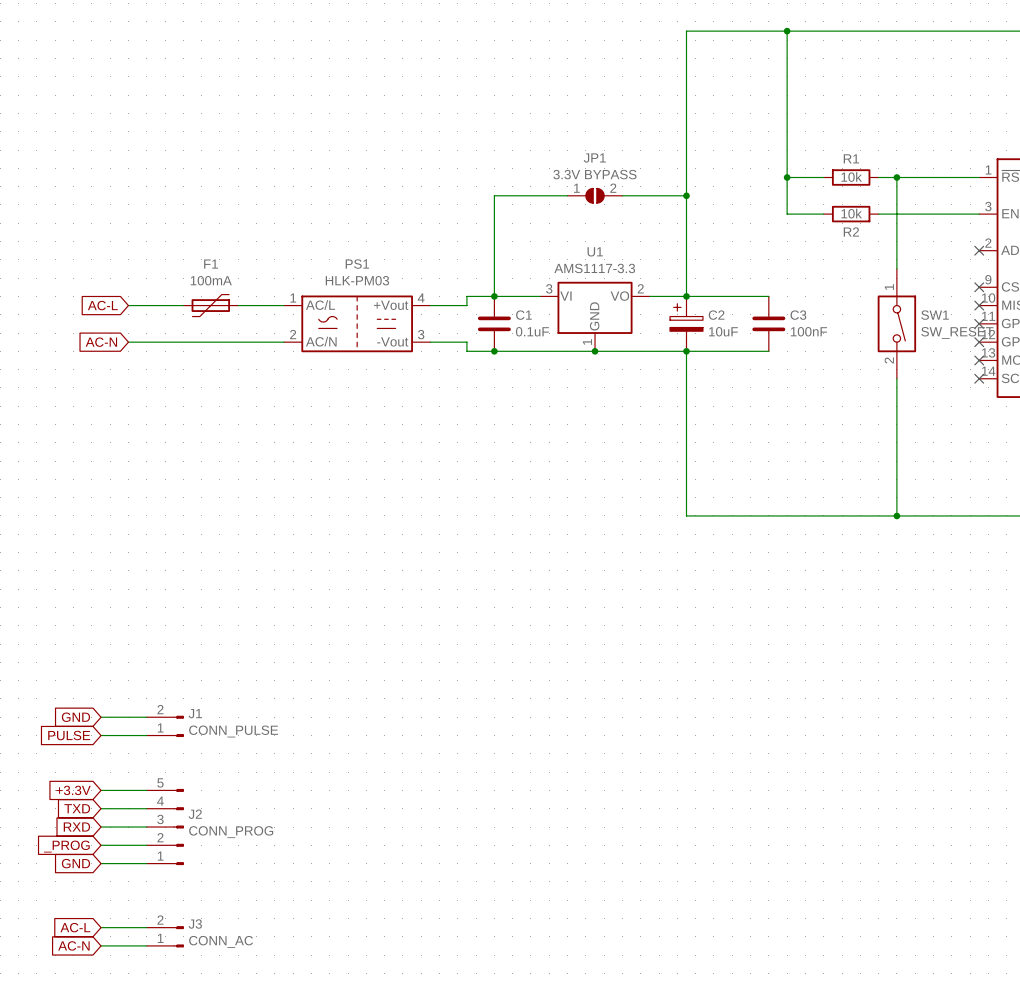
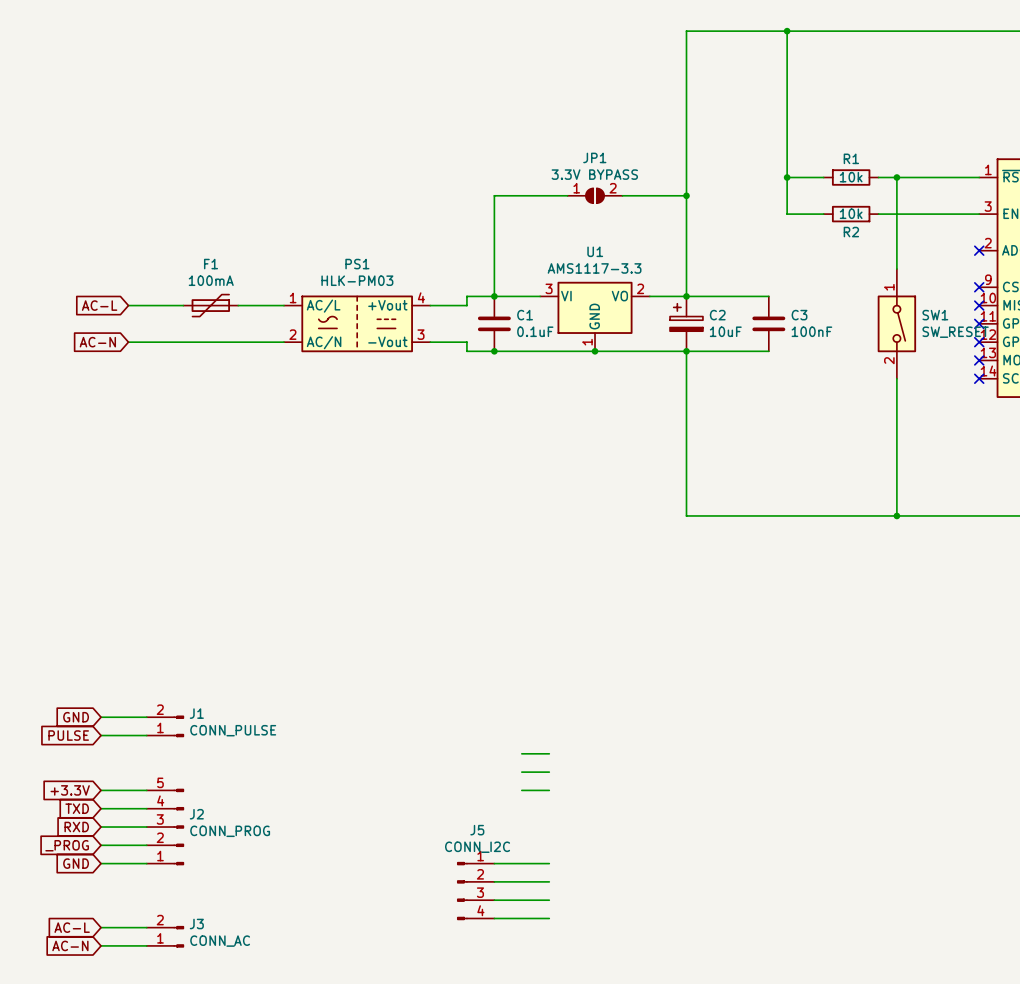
wire: none -> (521, 753) (549, 753)
wire: none -> (521, 772) (549, 772)
wire: none -> (521, 790) (549, 790)
wire: none -> (494, 863) (549, 863)
wire: none -> (494, 881) (549, 881)
J5: none -> CONN_I2C (475, 891)
wire: none -> (494, 900) (549, 900)
wire: none -> (494, 918) (549, 918)

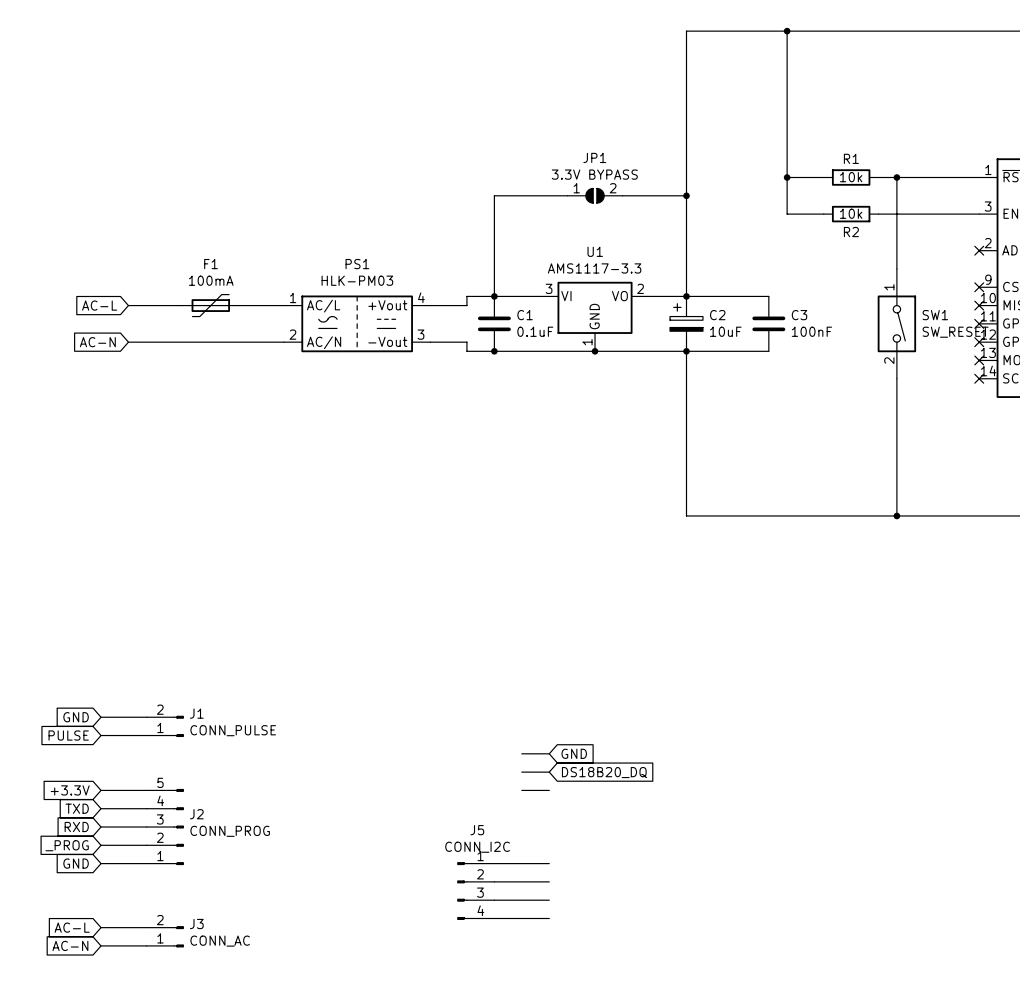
global label: none -> GND (574, 753)
global label: none -> DS18B20_DQ (604, 772)

